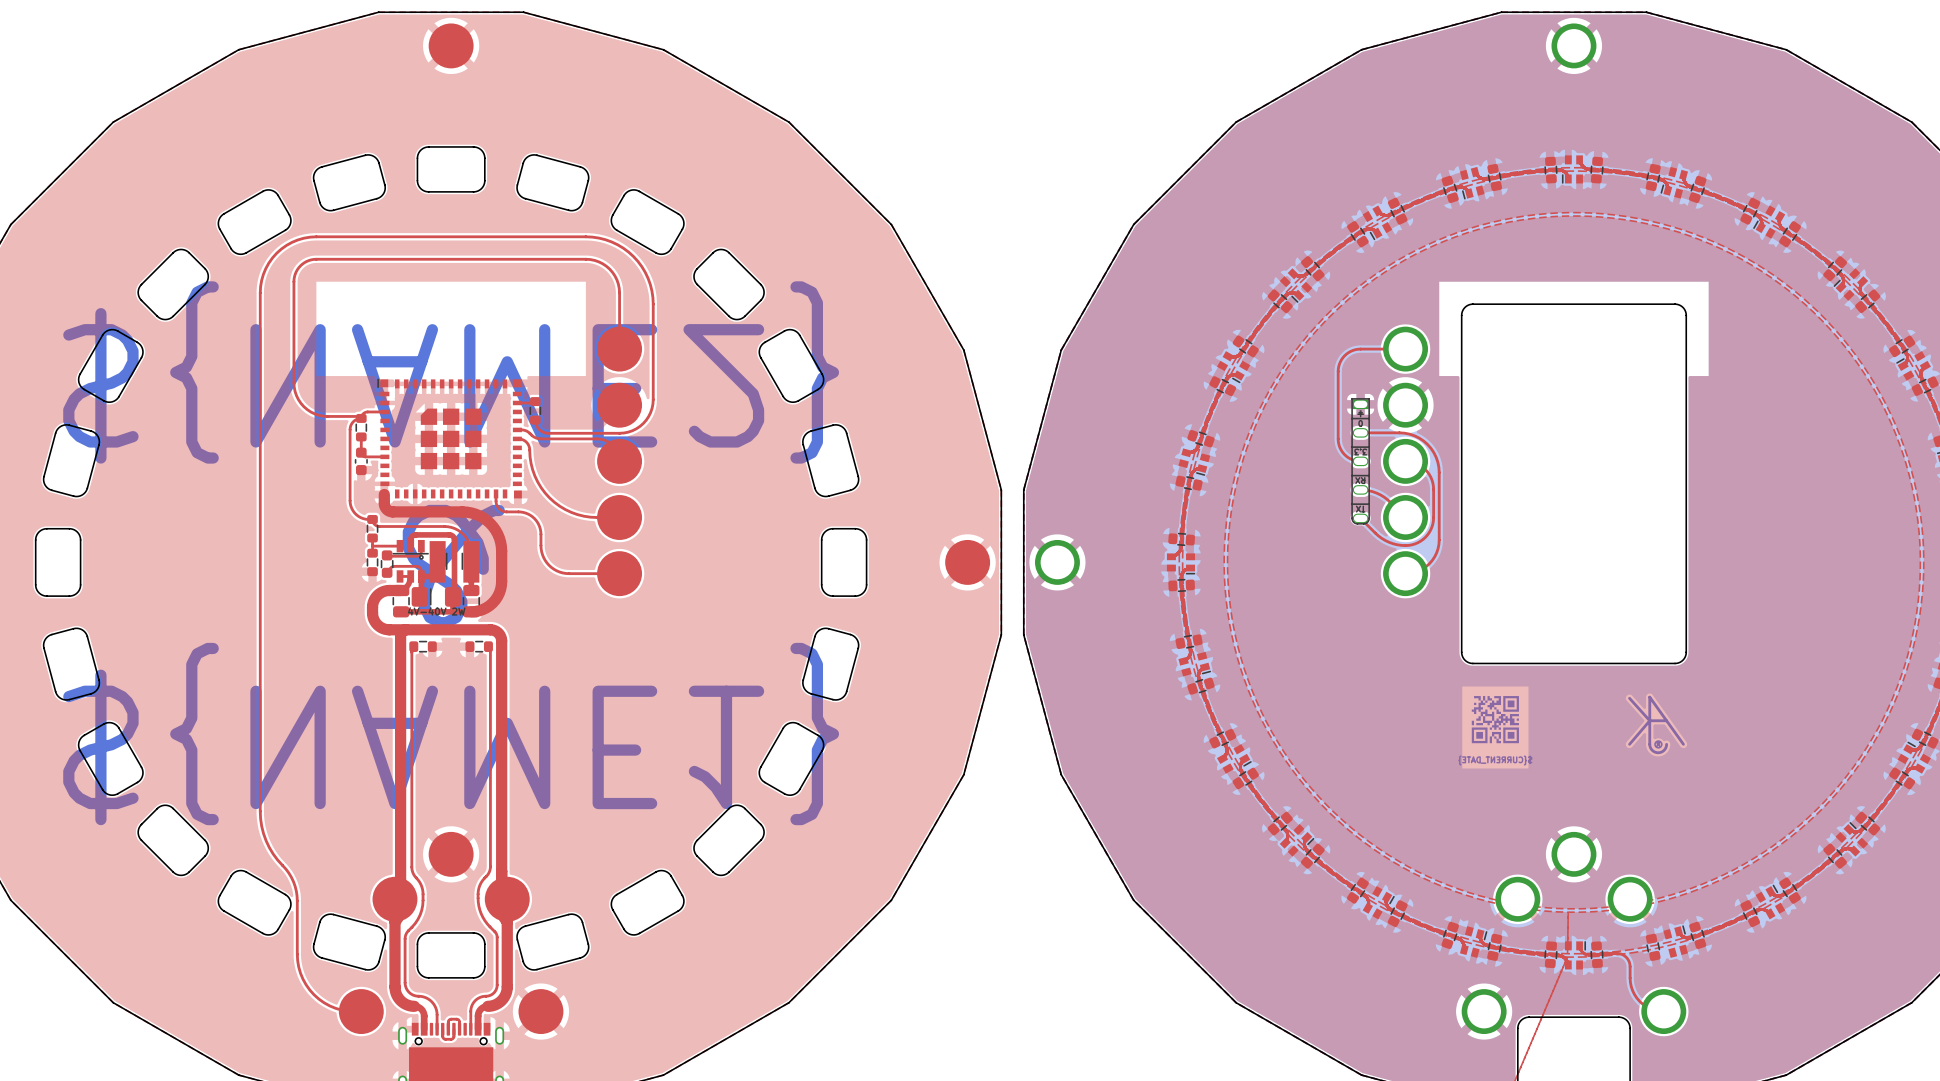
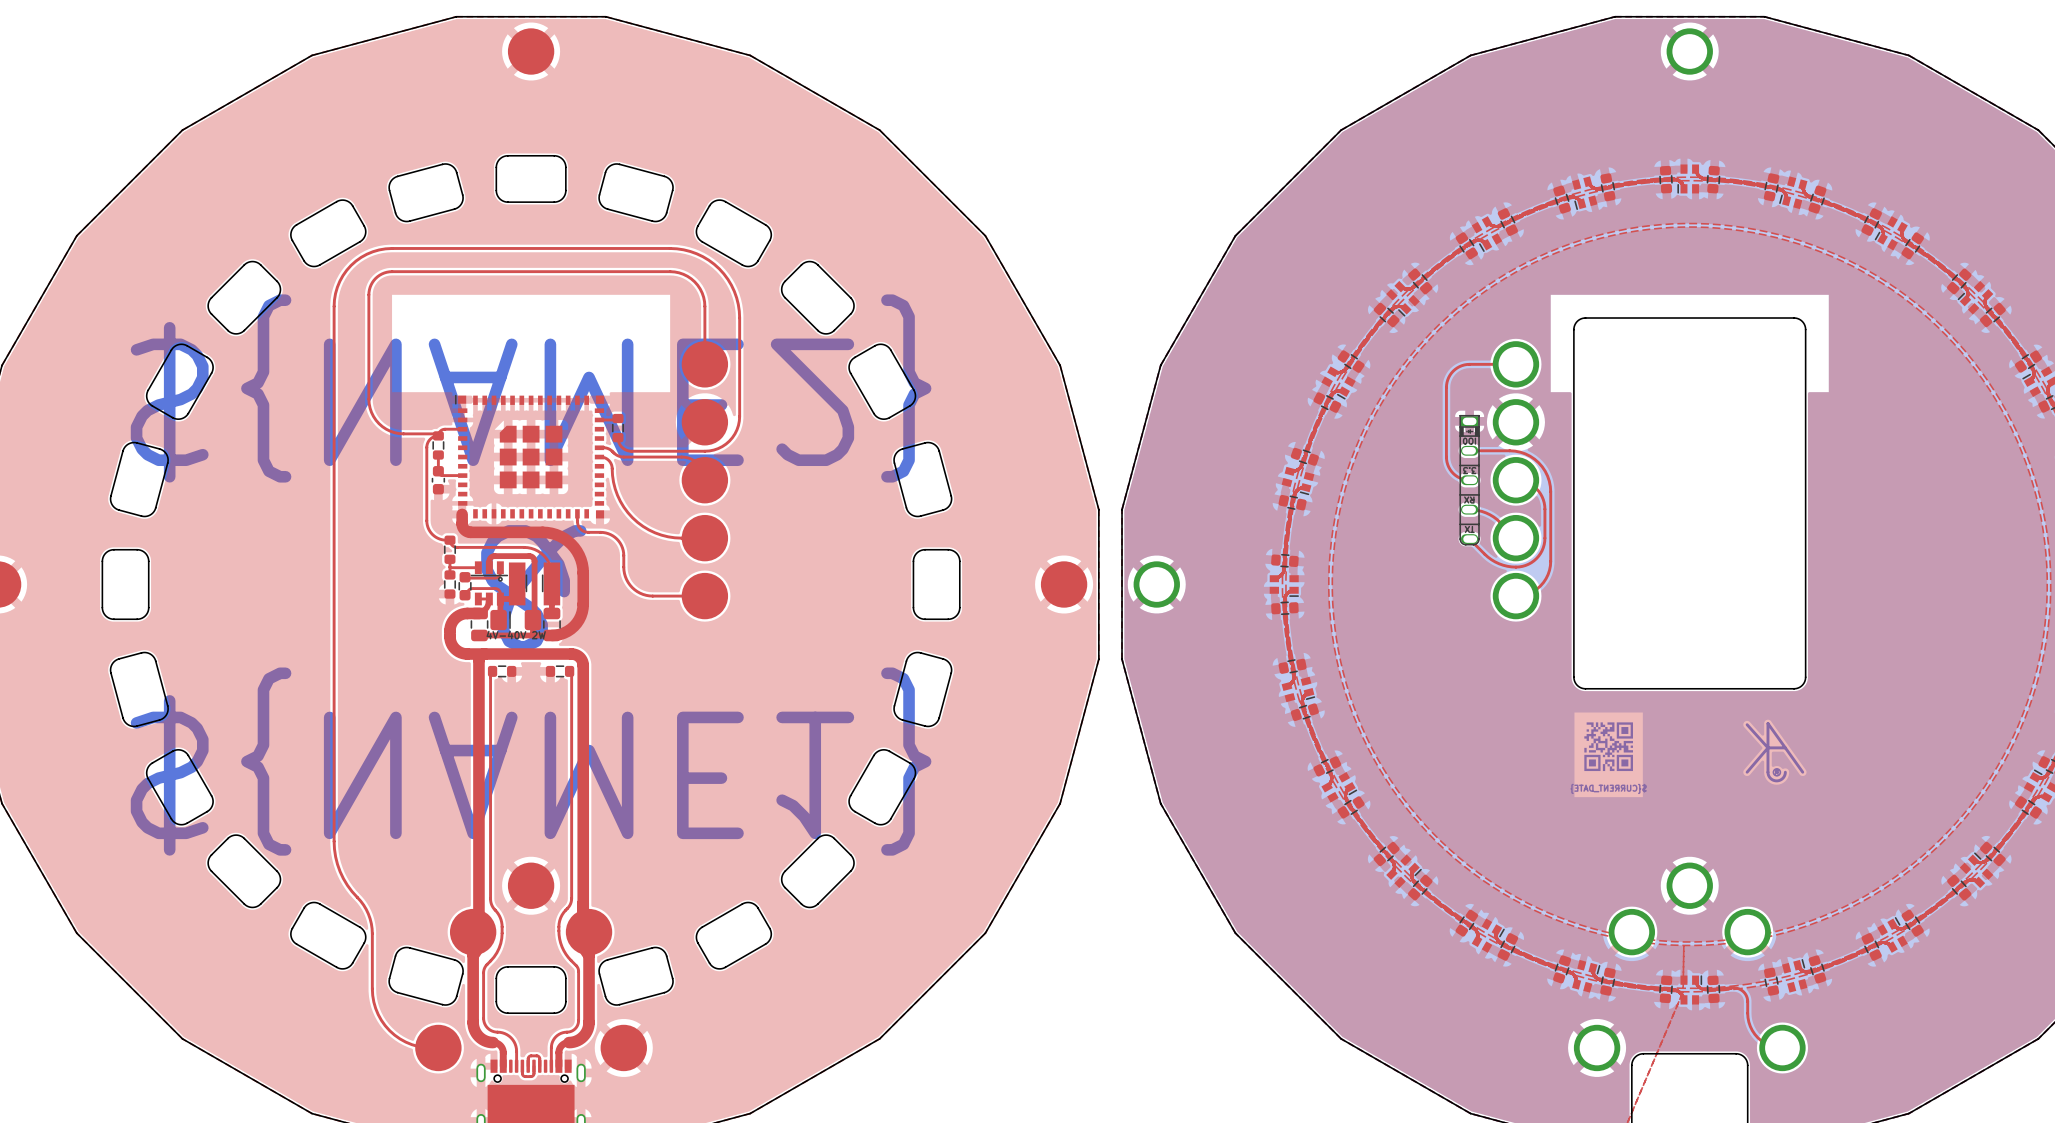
part footprint: [1351, 398, 1370, 525] -> [1459, 415, 1480, 546]

